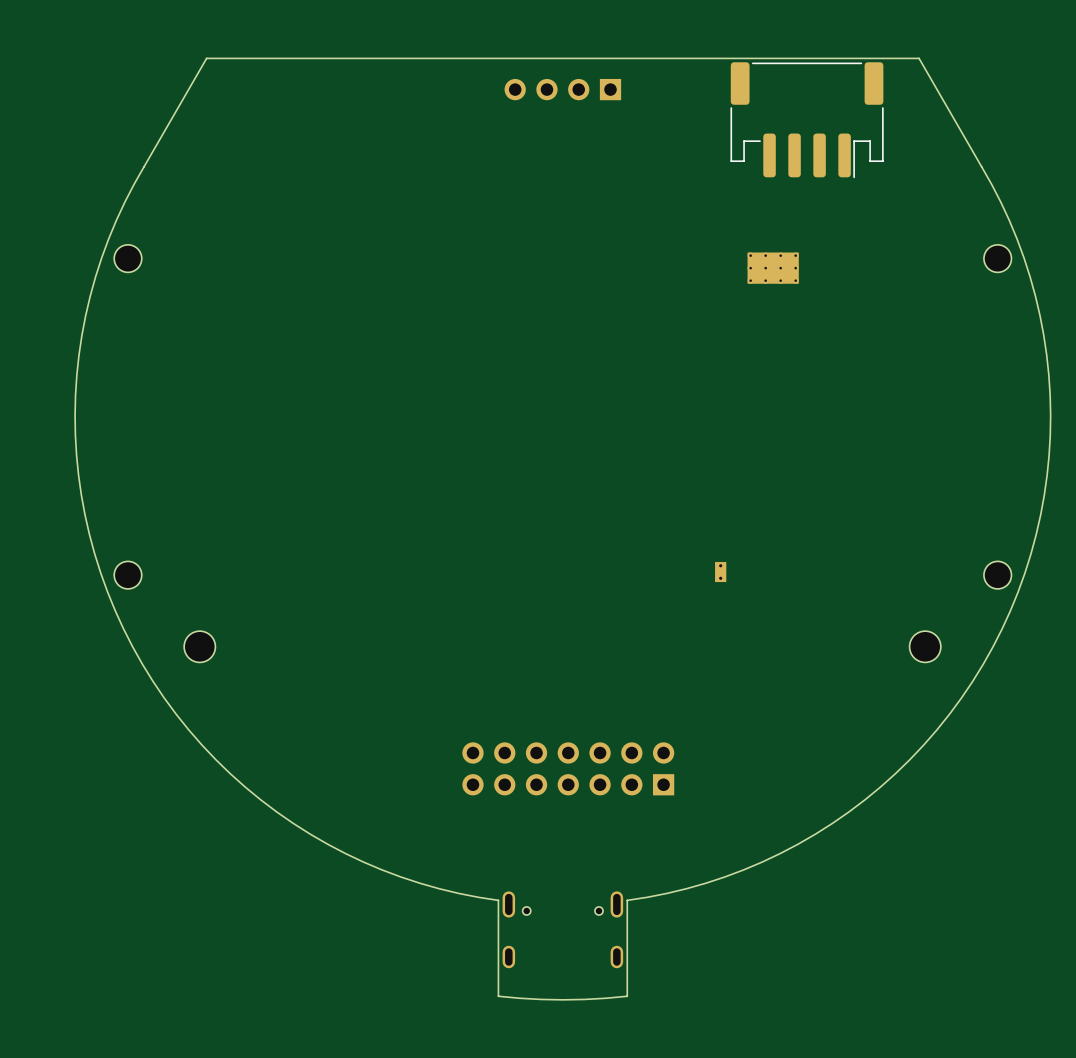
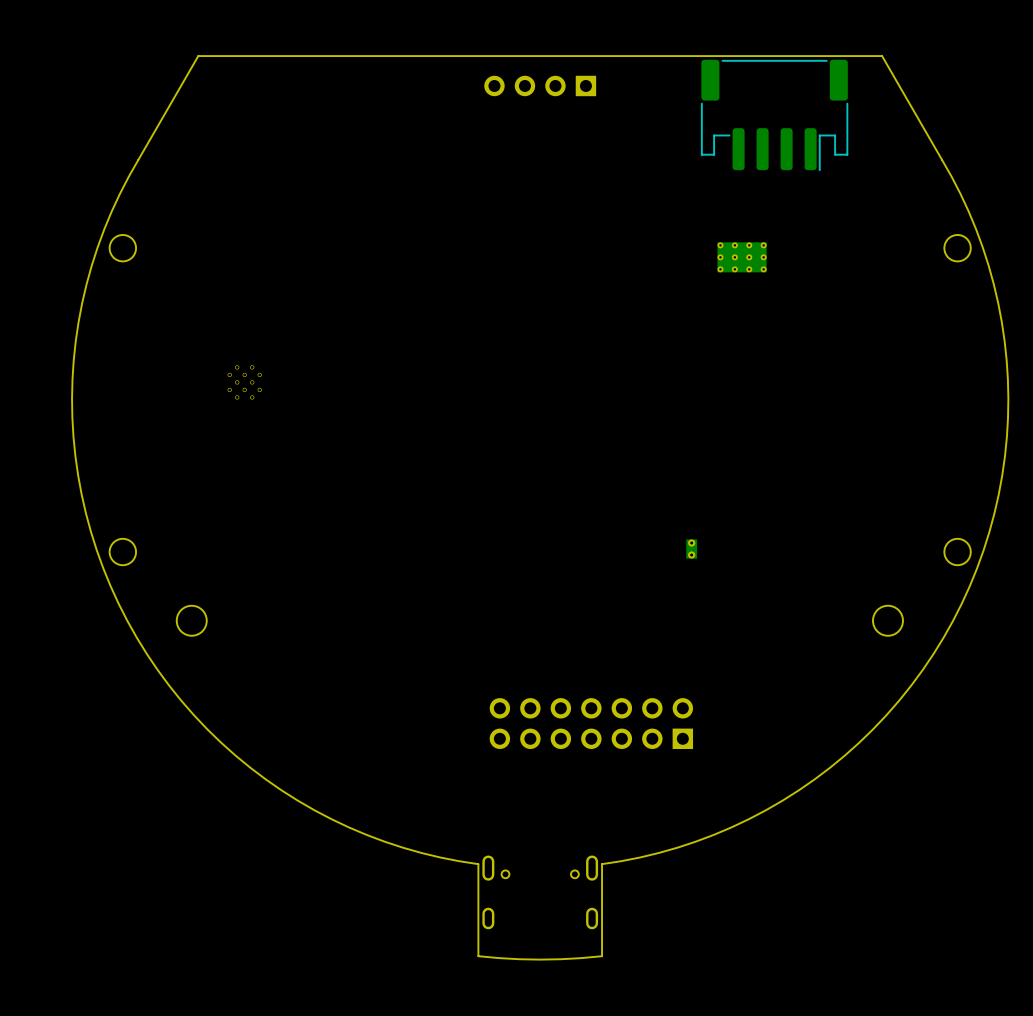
part: none -> (244, 382)
part position: (568, 768) -> (591, 723)

